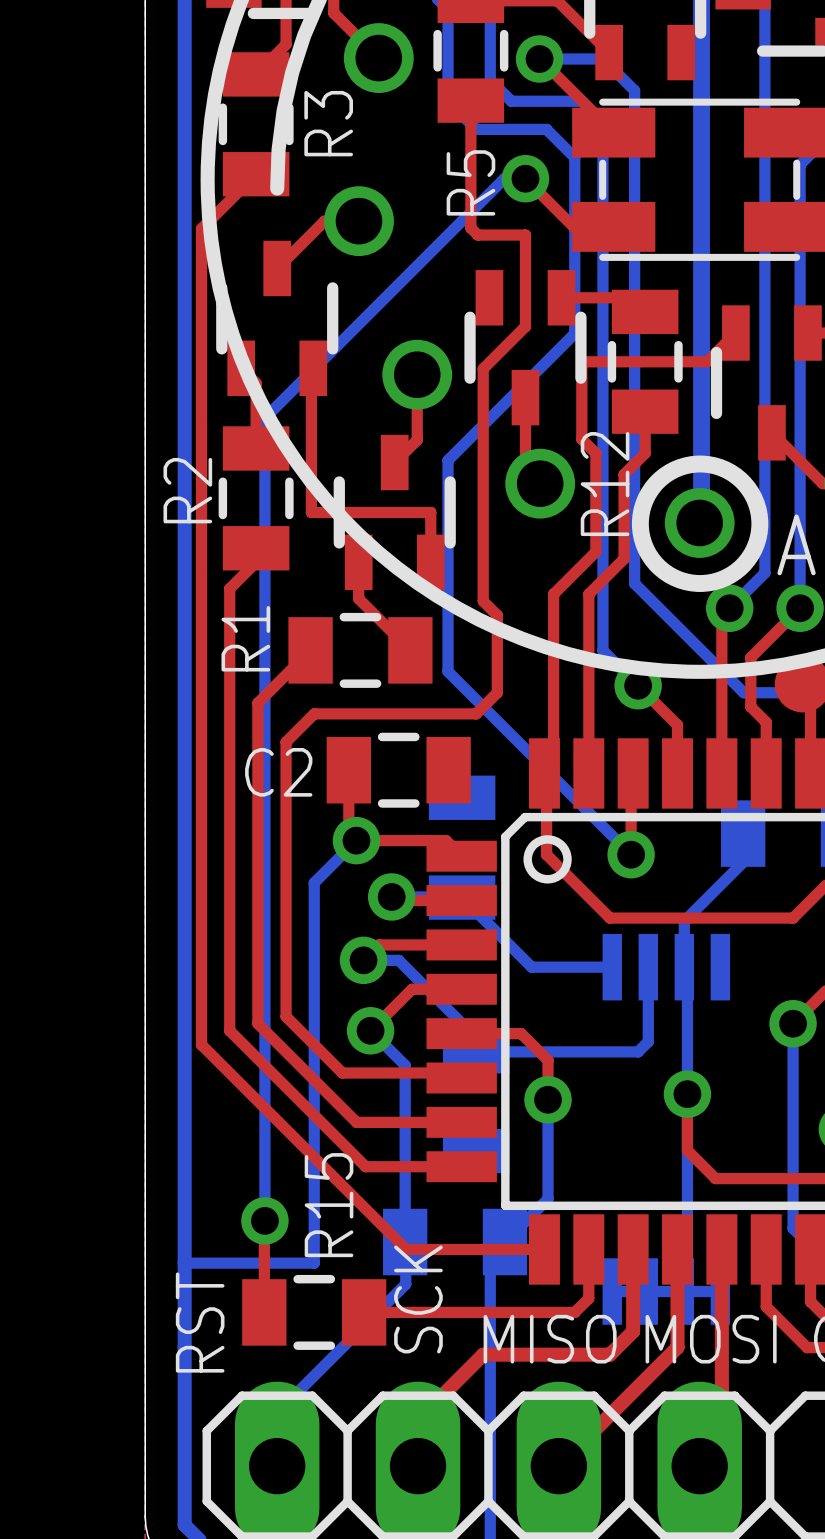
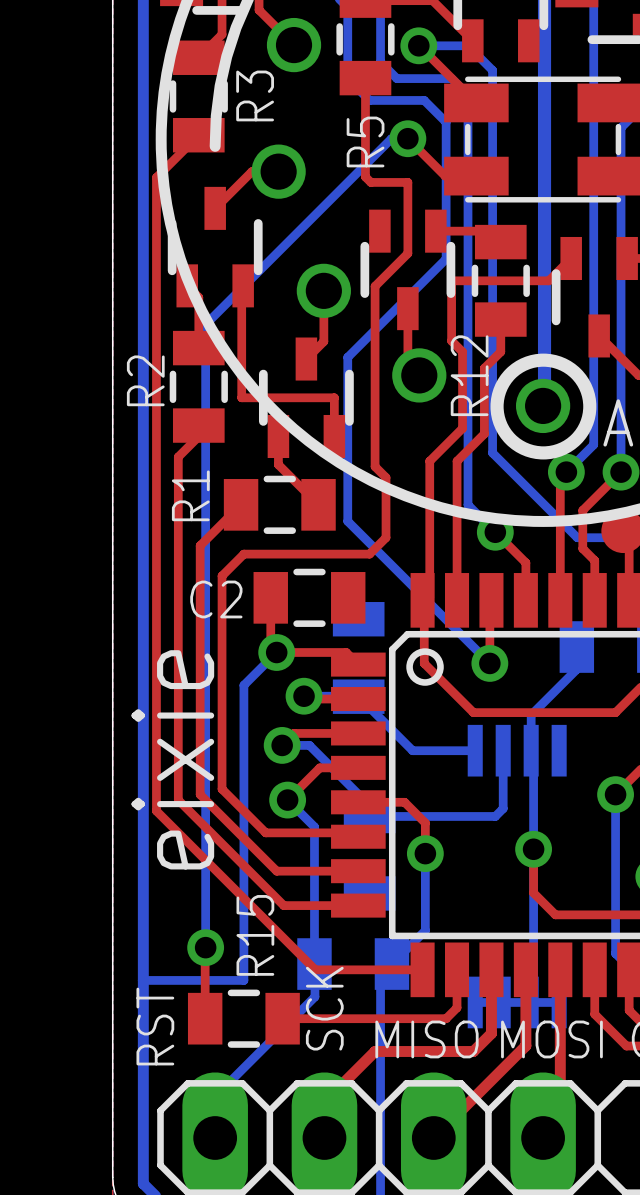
text: none -> eixie (172, 759)

